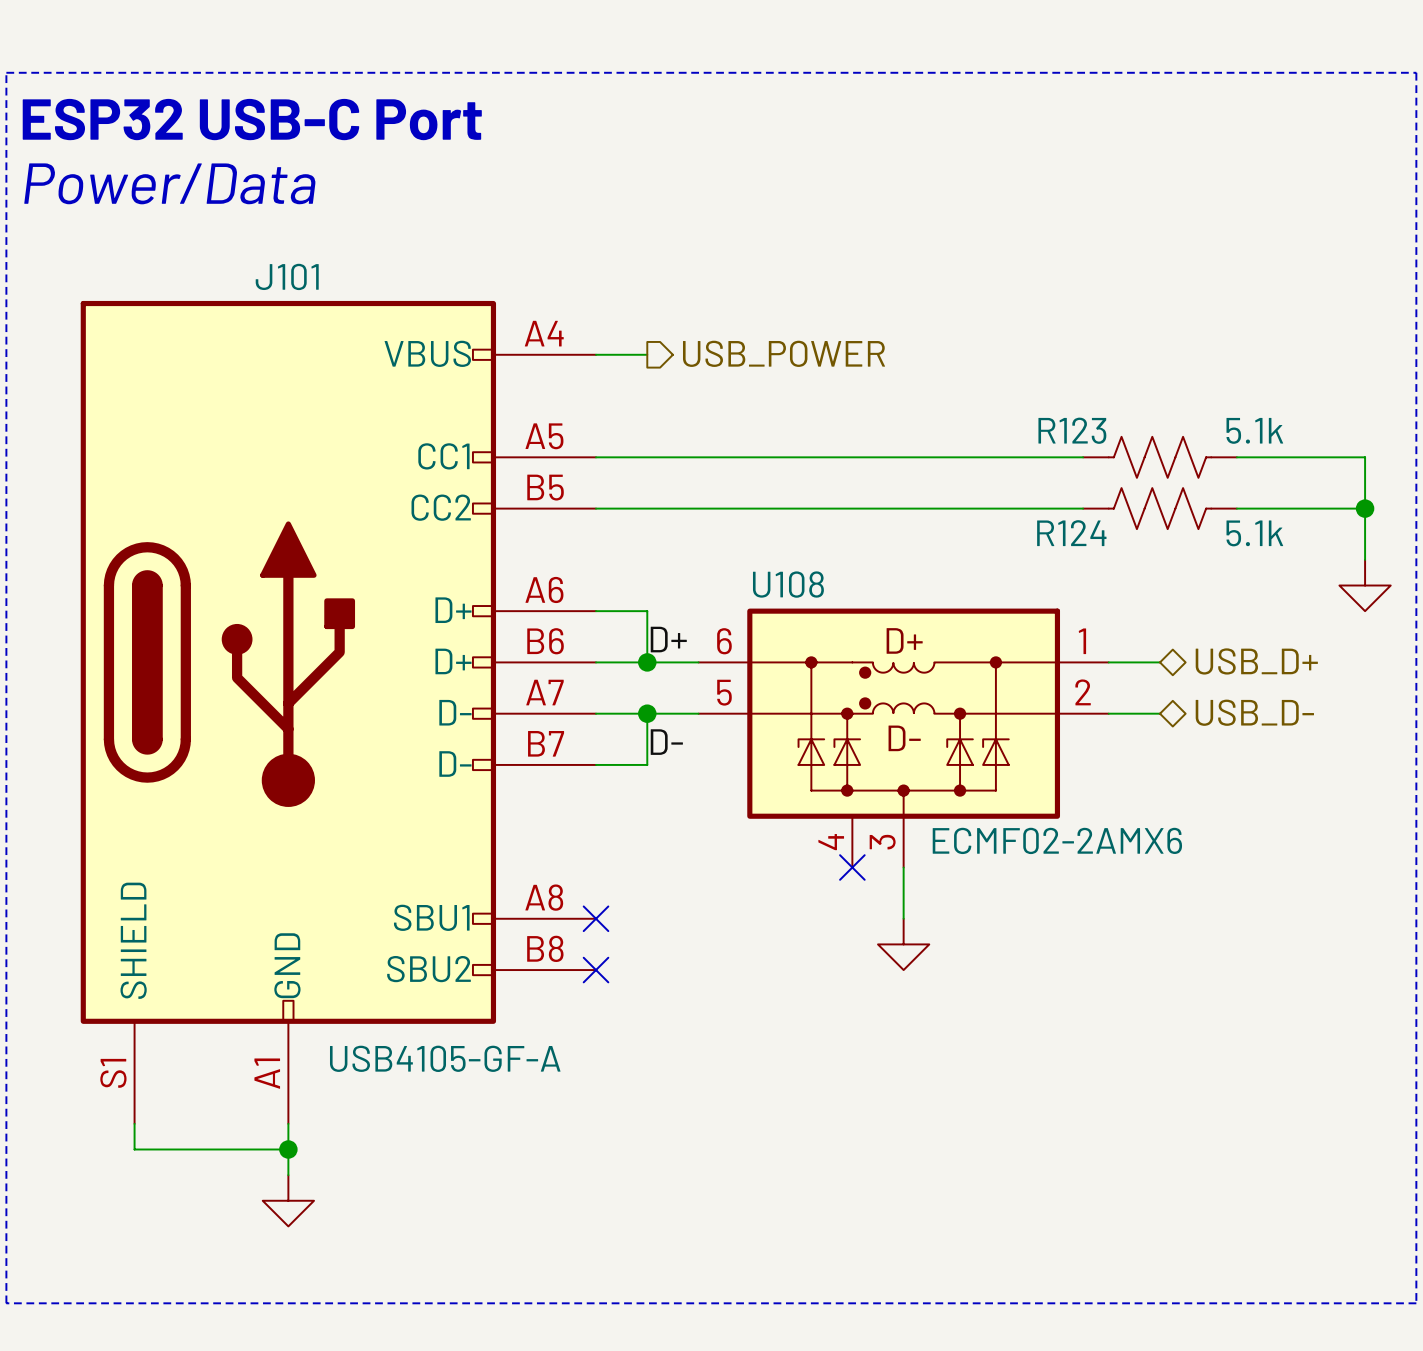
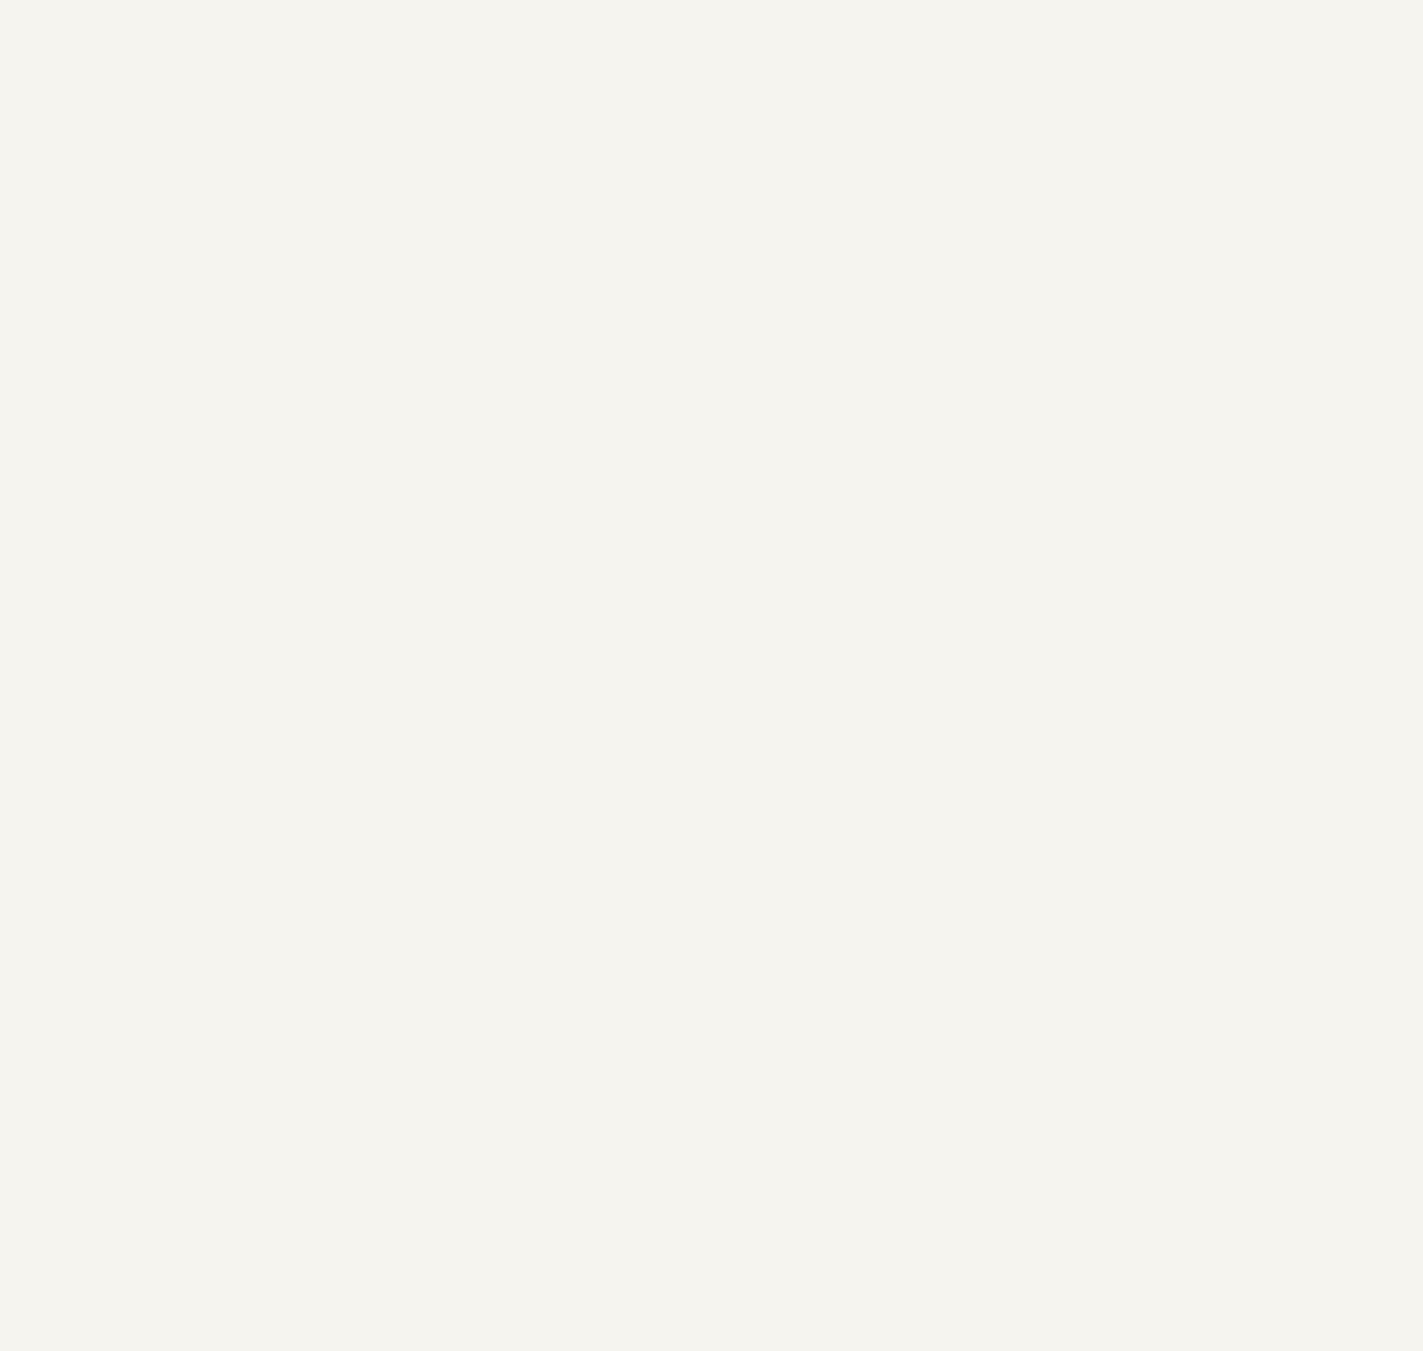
line: (6, 72) (6, 1303) (1416, 1303) (1416, 72) (6, 72) -> none
text: ESP32 USB-C Port (252, 119) -> none
text: Power/Data (170, 183) -> none
hierarchical label: USB_POWER (784, 353) -> none
wire: (596, 354) (647, 354) -> none
wire: (596, 457) (1083, 457) -> none
R123: 5.1k (1159, 457) -> none
wire: (1236, 457) (1365, 457) (1365, 559) -> none
wire: (596, 508) (1083, 508) -> none
R124: 5.1k (1159, 508) -> none
wire: (1236, 508) (1365, 508) -> none
junction: (1365, 508) -> none
power symbol: (1365, 585) -> none
wire: (596, 611) (647, 611) (647, 662) -> none
label: D+ (668, 639) -> none
hierarchical label: USB_D+ (1256, 661) -> none
wire: (596, 662) (698, 662) -> none
junction: (647, 662) -> none
wire: (1108, 662) (1159, 662) -> none
J101: USB4105-GF-A (338, 712) -> none
hierarchical label: USB_D- (1254, 712) -> none
wire: (596, 713) (698, 713) -> none
wire: (647, 713) (647, 764) (596, 764) -> none
junction: (647, 713) -> none
wire: (1108, 713) (1159, 713) -> none
U108: ECMF02-2AMX6 (903, 738) -> none
label: D- (666, 742) -> none
no-connect mark: (852, 867) -> none
wire: (903, 867) (903, 918) -> none
no-connect mark: (596, 918) -> none
power symbol: (903, 944) -> none
no-connect mark: (596, 970) -> none
wire: (134, 1123) (134, 1149) (288, 1149) -> none
wire: (288, 1123) (288, 1175) -> none
junction: (288, 1149) -> none
power symbol: (288, 1200) -> none

